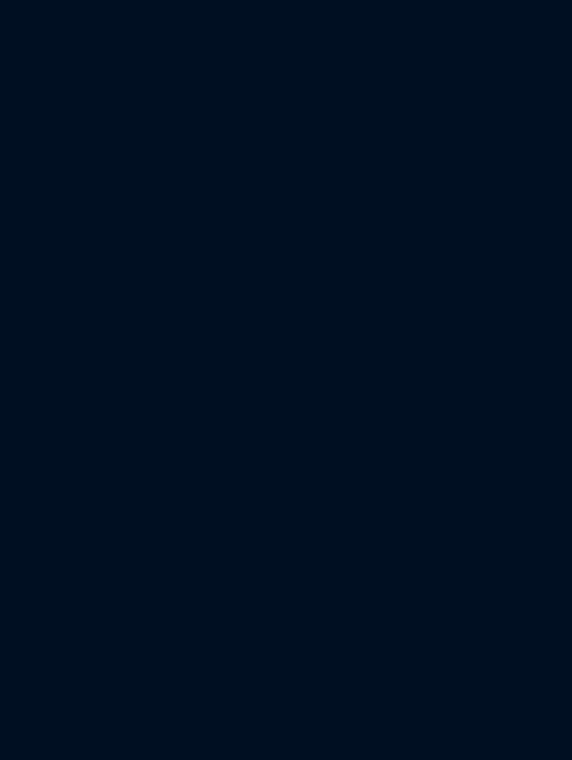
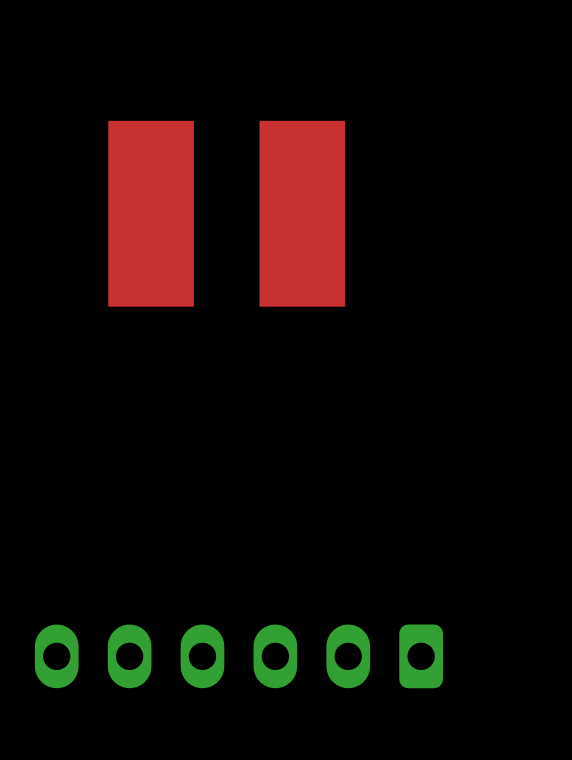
part: none -> (226, 213)
part: none -> (238, 656)

